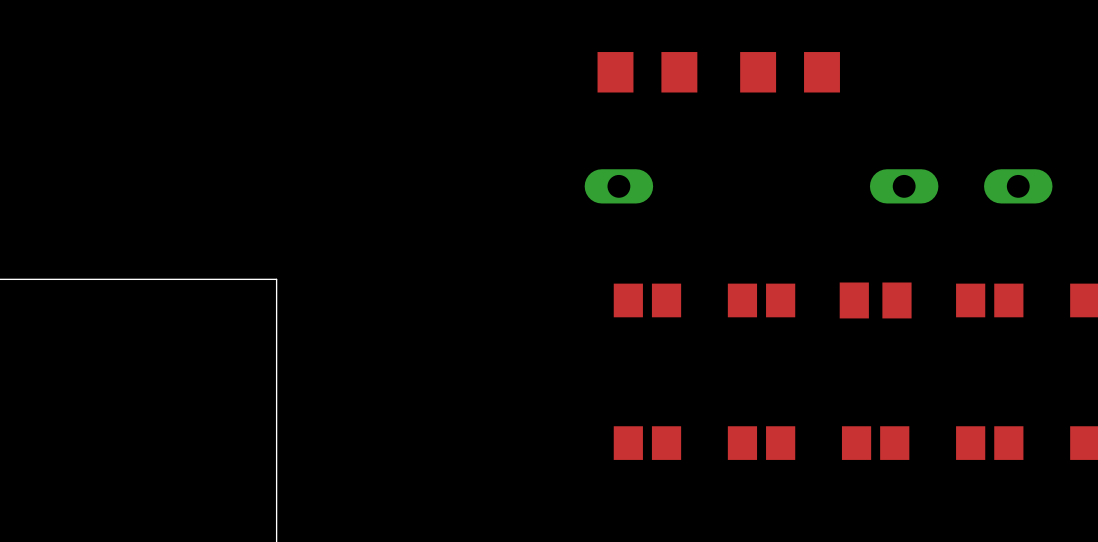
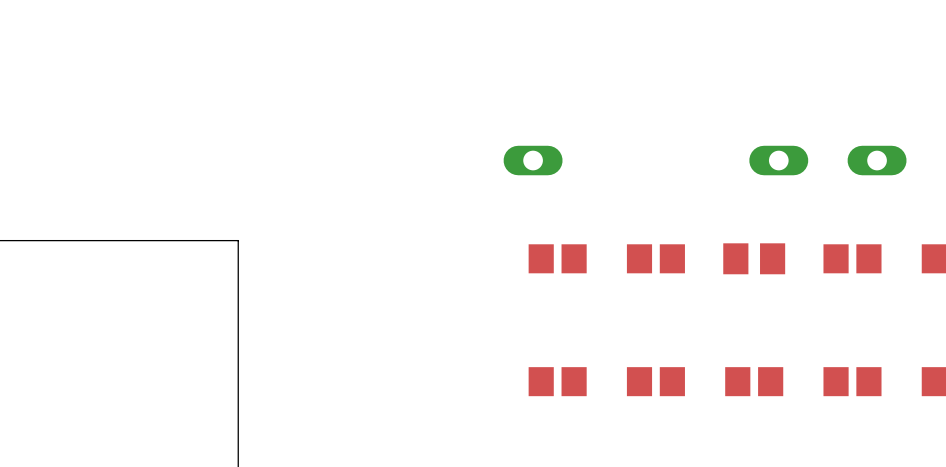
part: (647, 72) -> none
part: (790, 72) -> none

